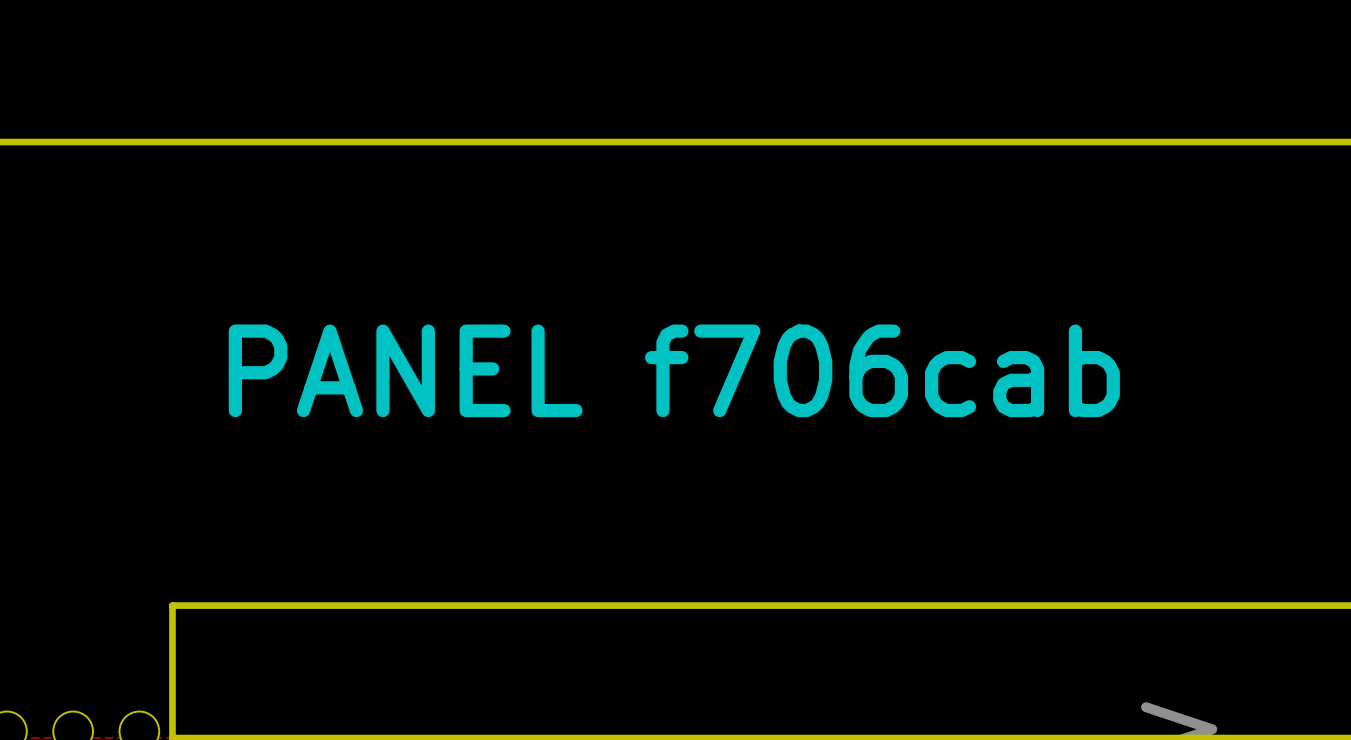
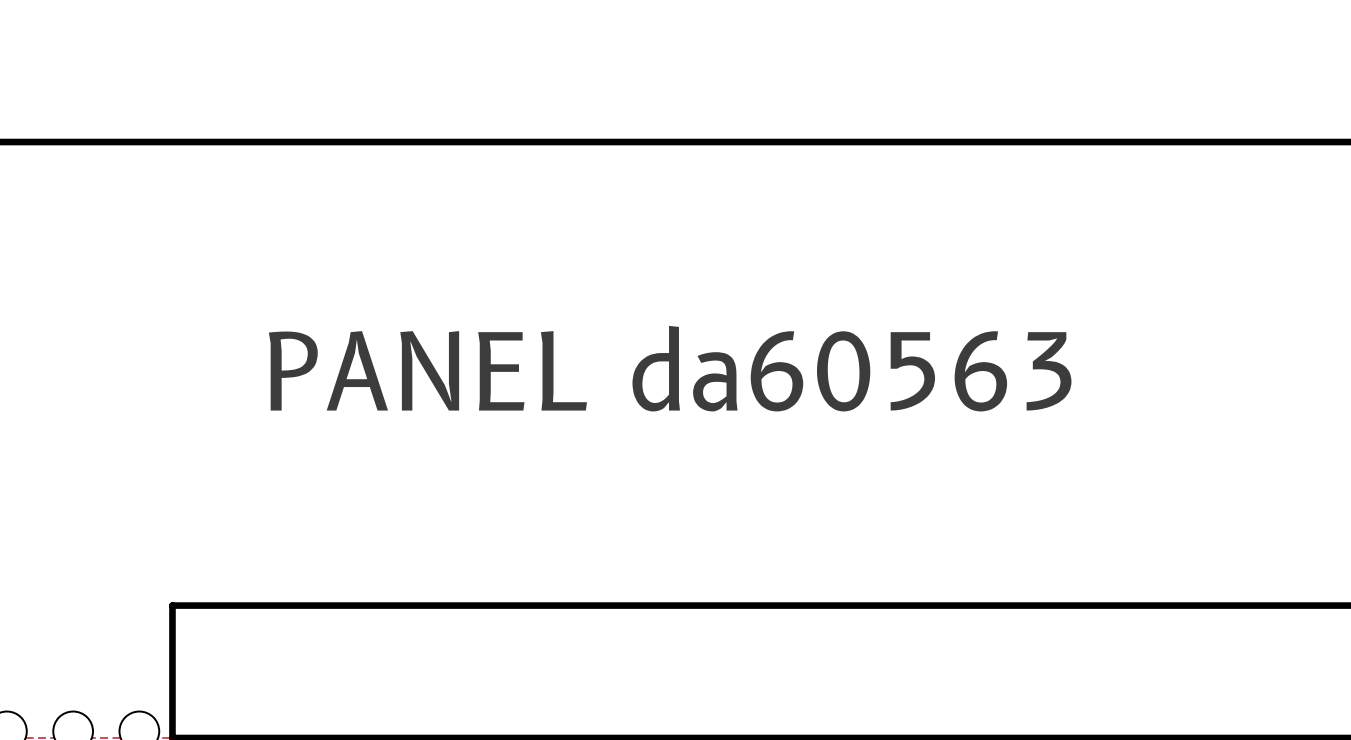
text: PANEL f706cab (674, 370) -> PANEL da60563 (670, 368)

